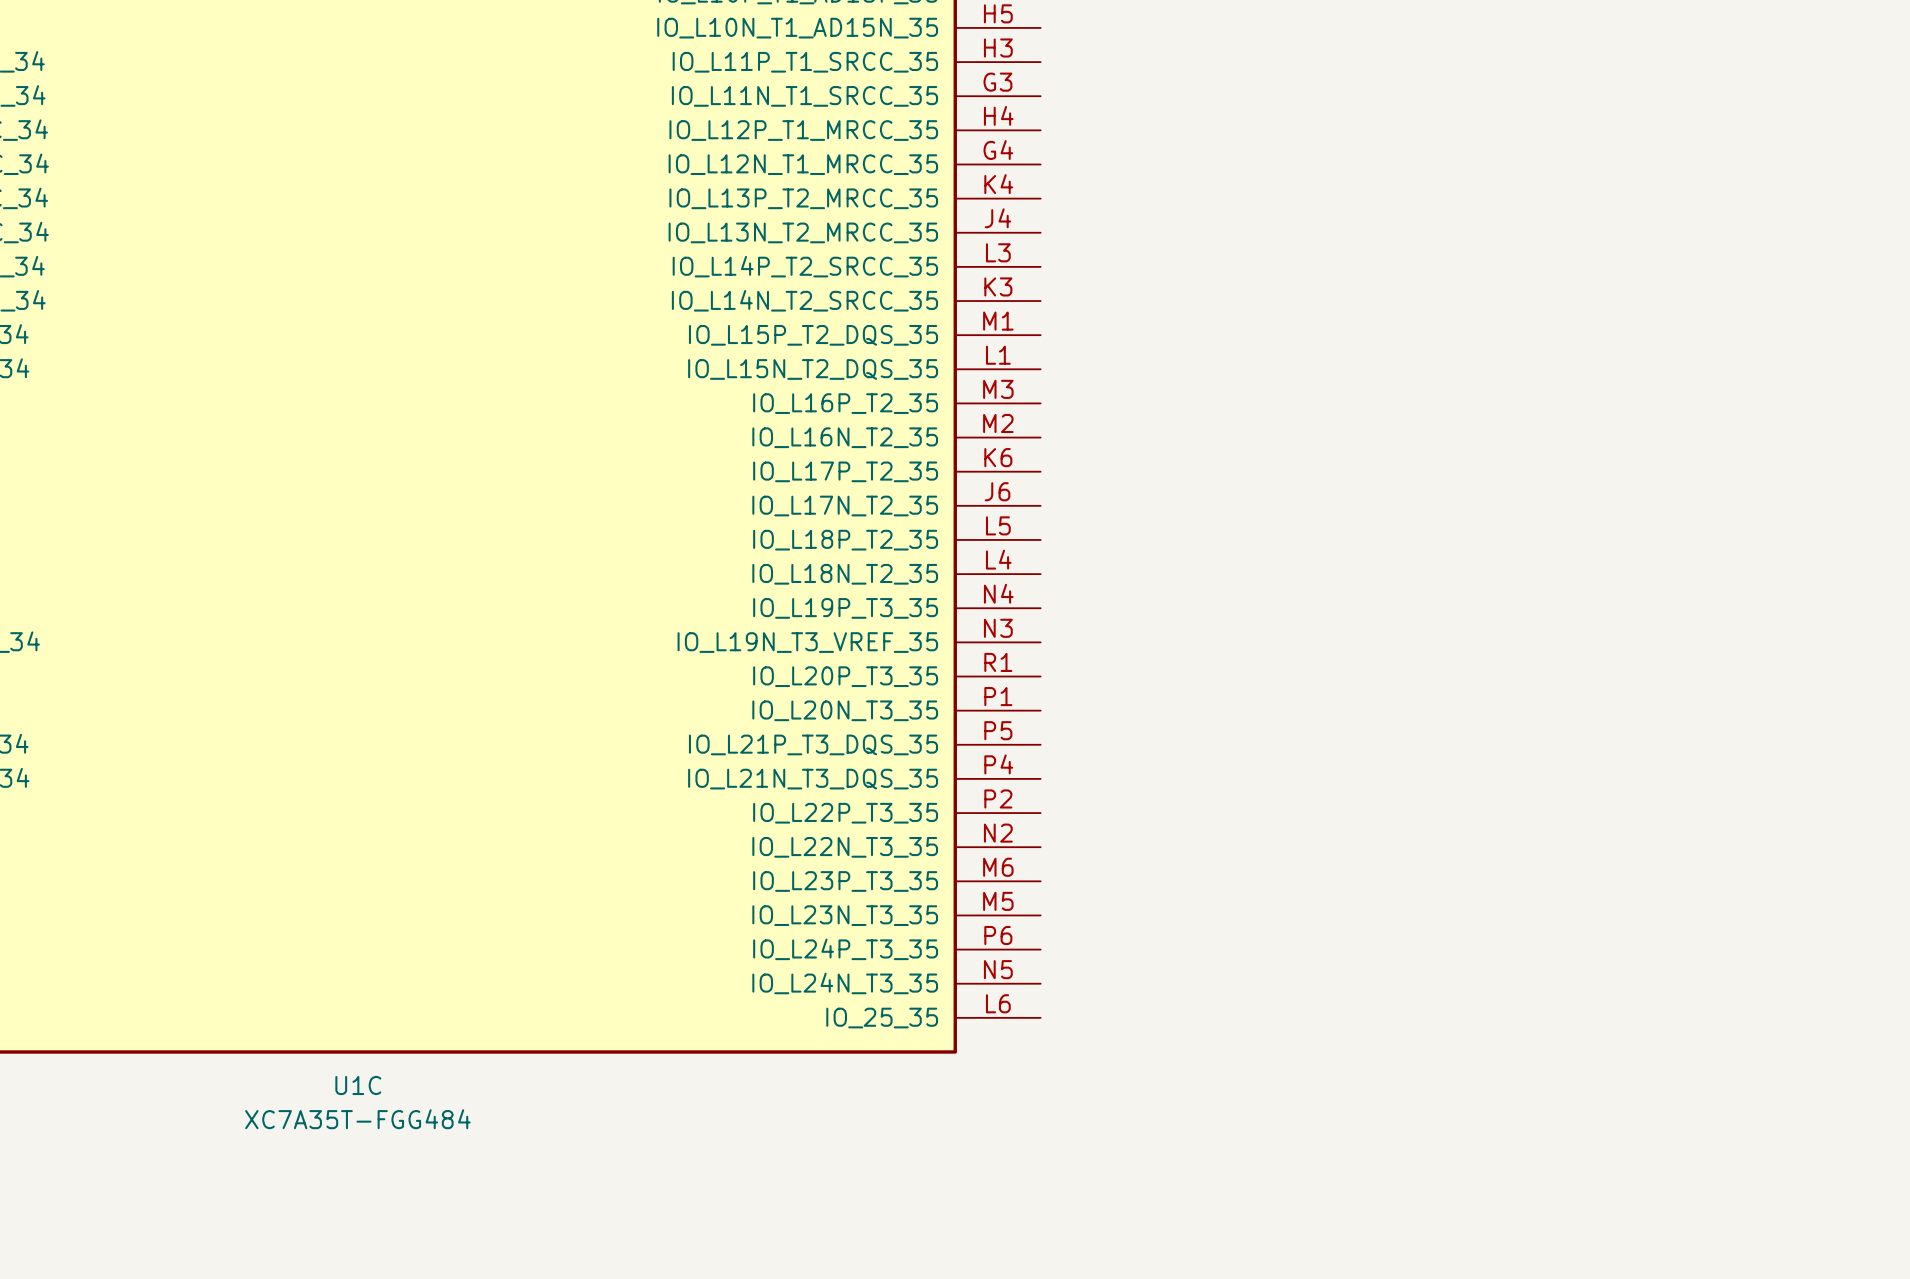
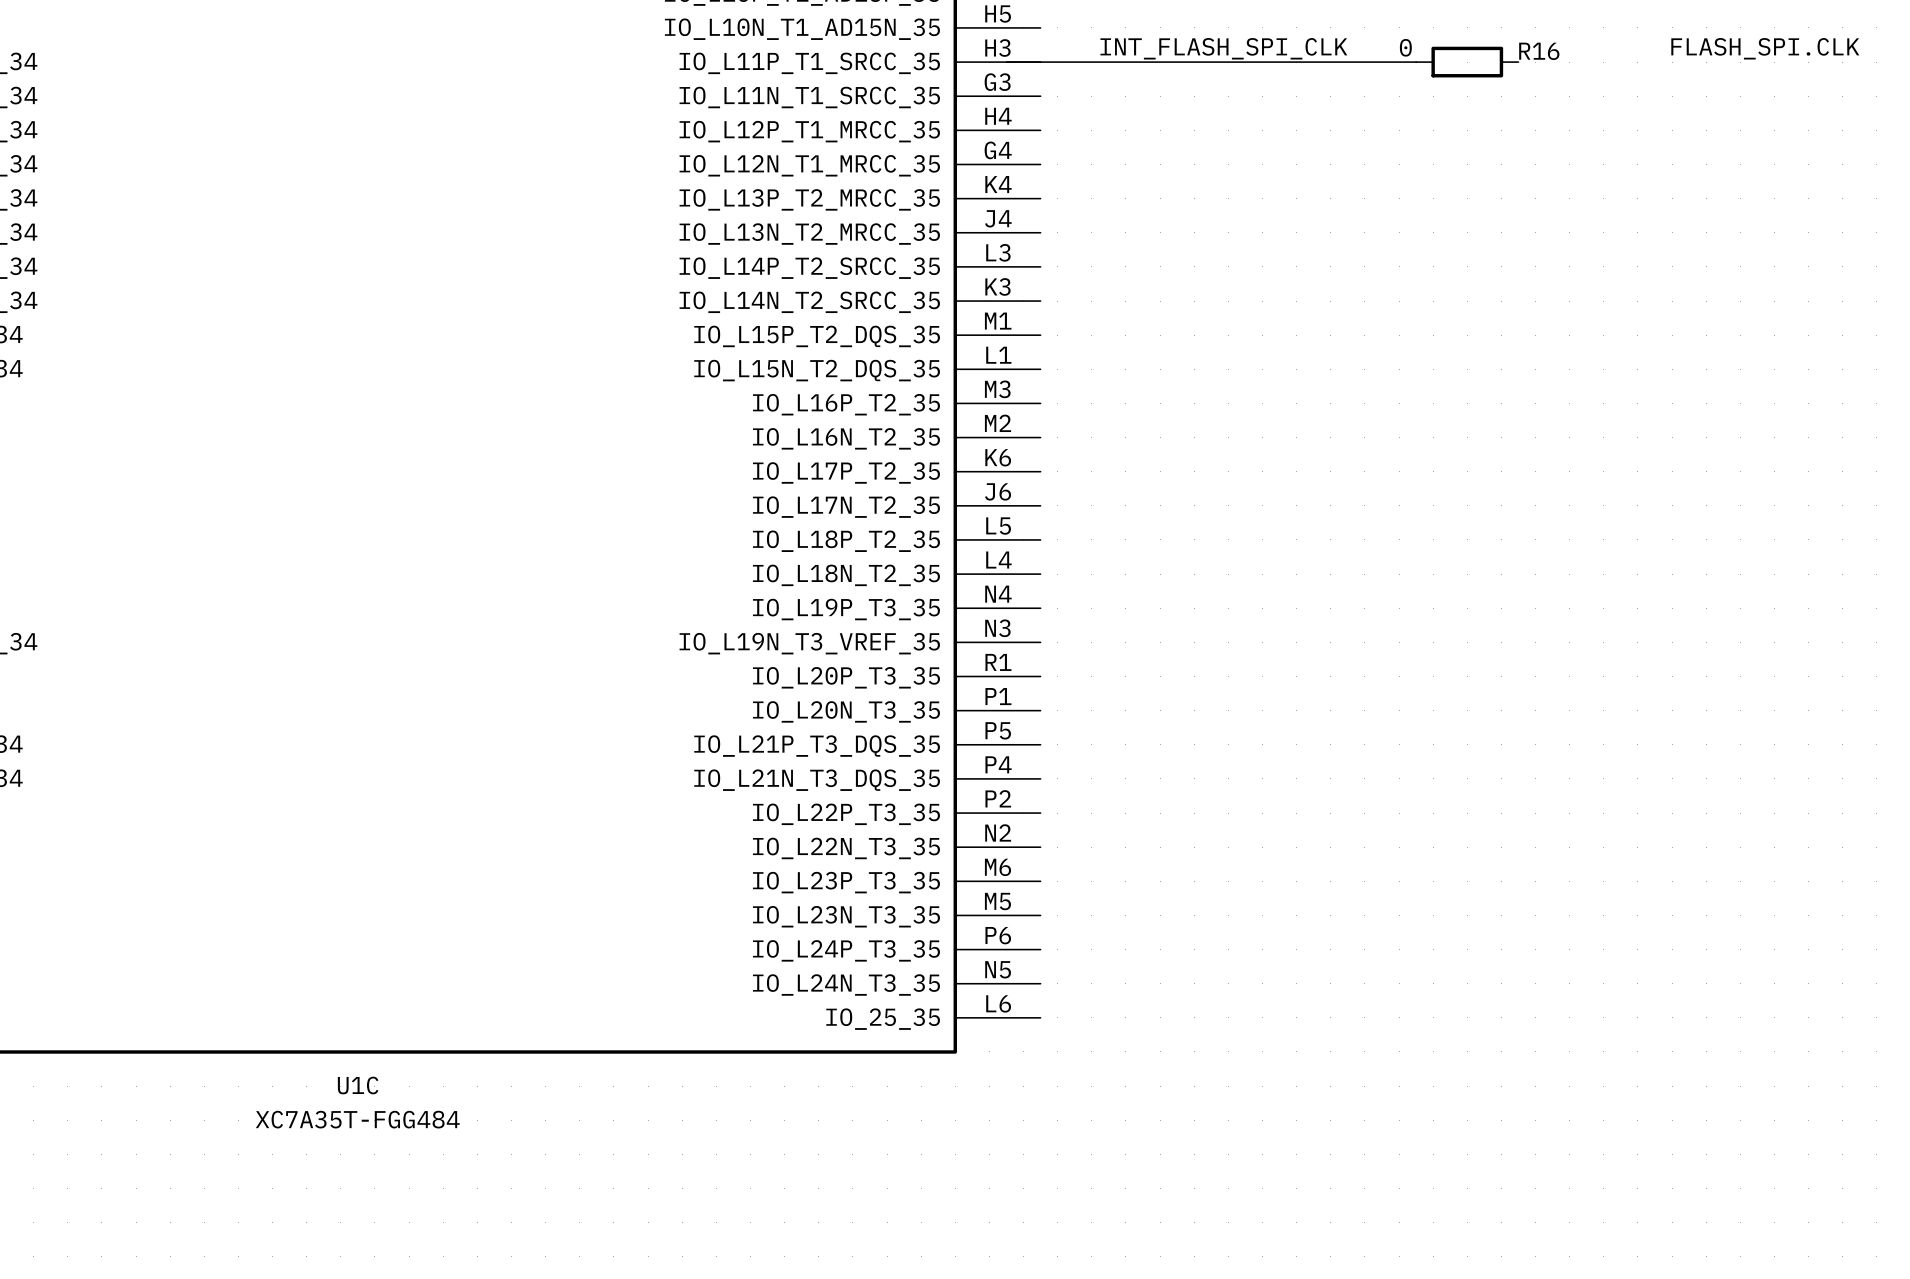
label: none -> INT_FLASH_SPI_CLK (1223, 48)
label: none -> FLASH_SPI.CLK (1765, 48)
wire: none -> (1006, 62) (1416, 62)
R16: none -> 0 (1467, 62)

